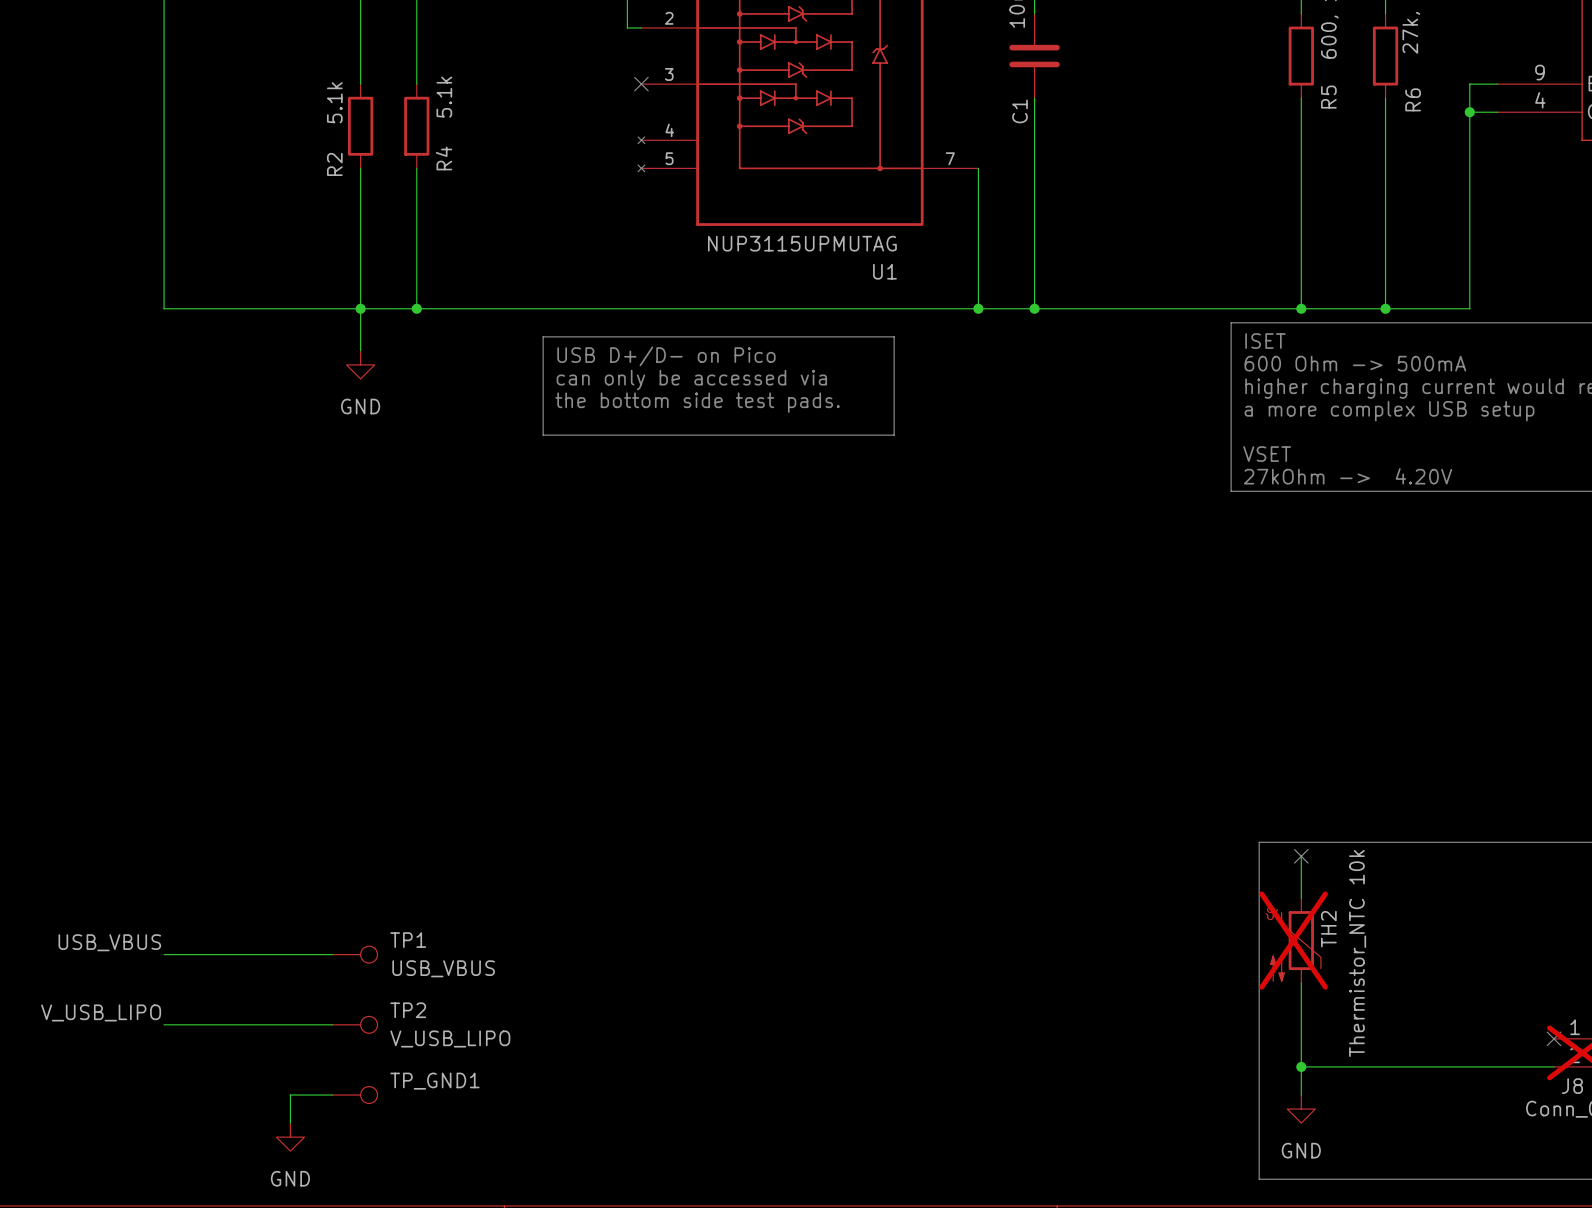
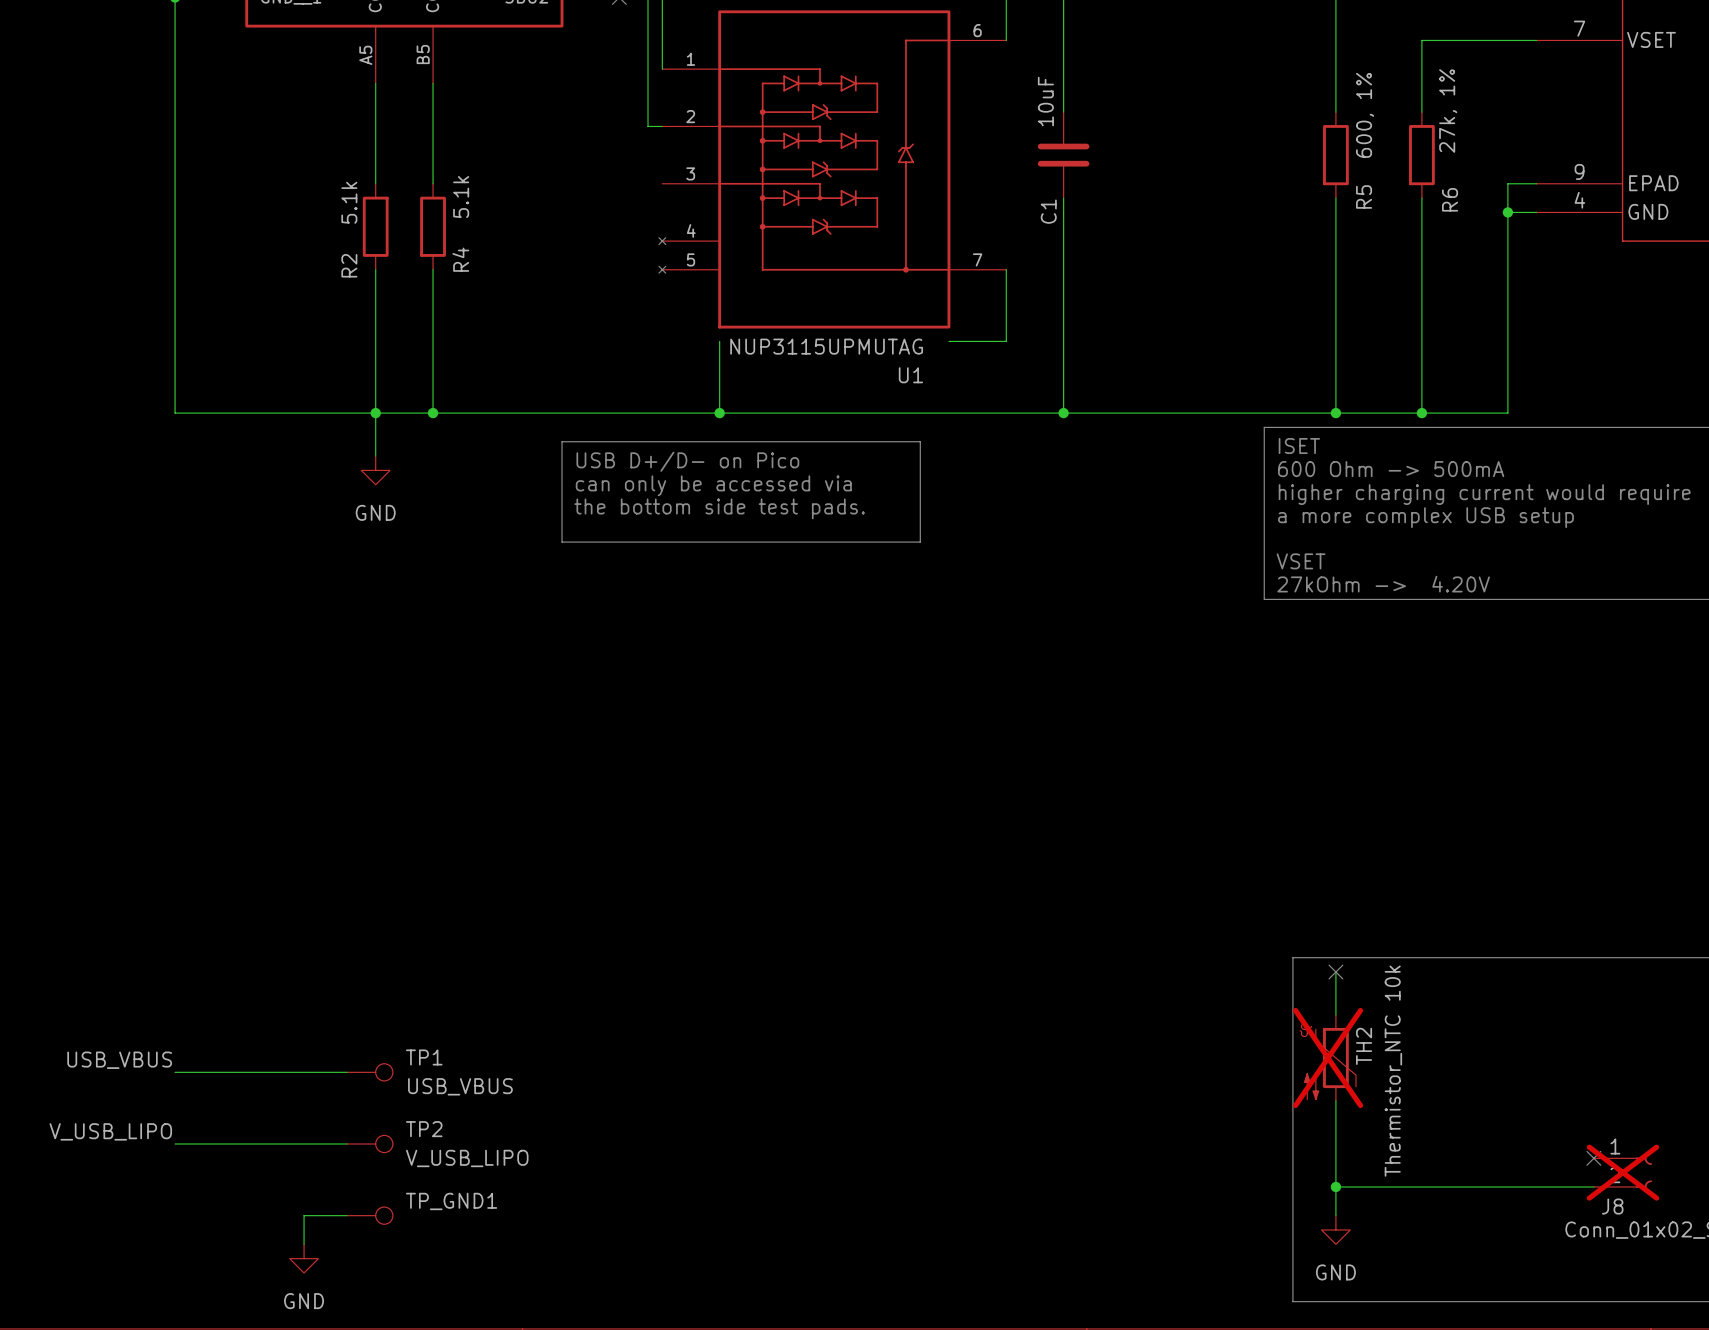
no-connect mark: (641, 84) -> none
wire: none -> (719, 341) (719, 413)
wire: (978, 238) (978, 308) -> (1006, 341) (948, 341)
junction: none -> (719, 413)
junction: (978, 308) -> none

